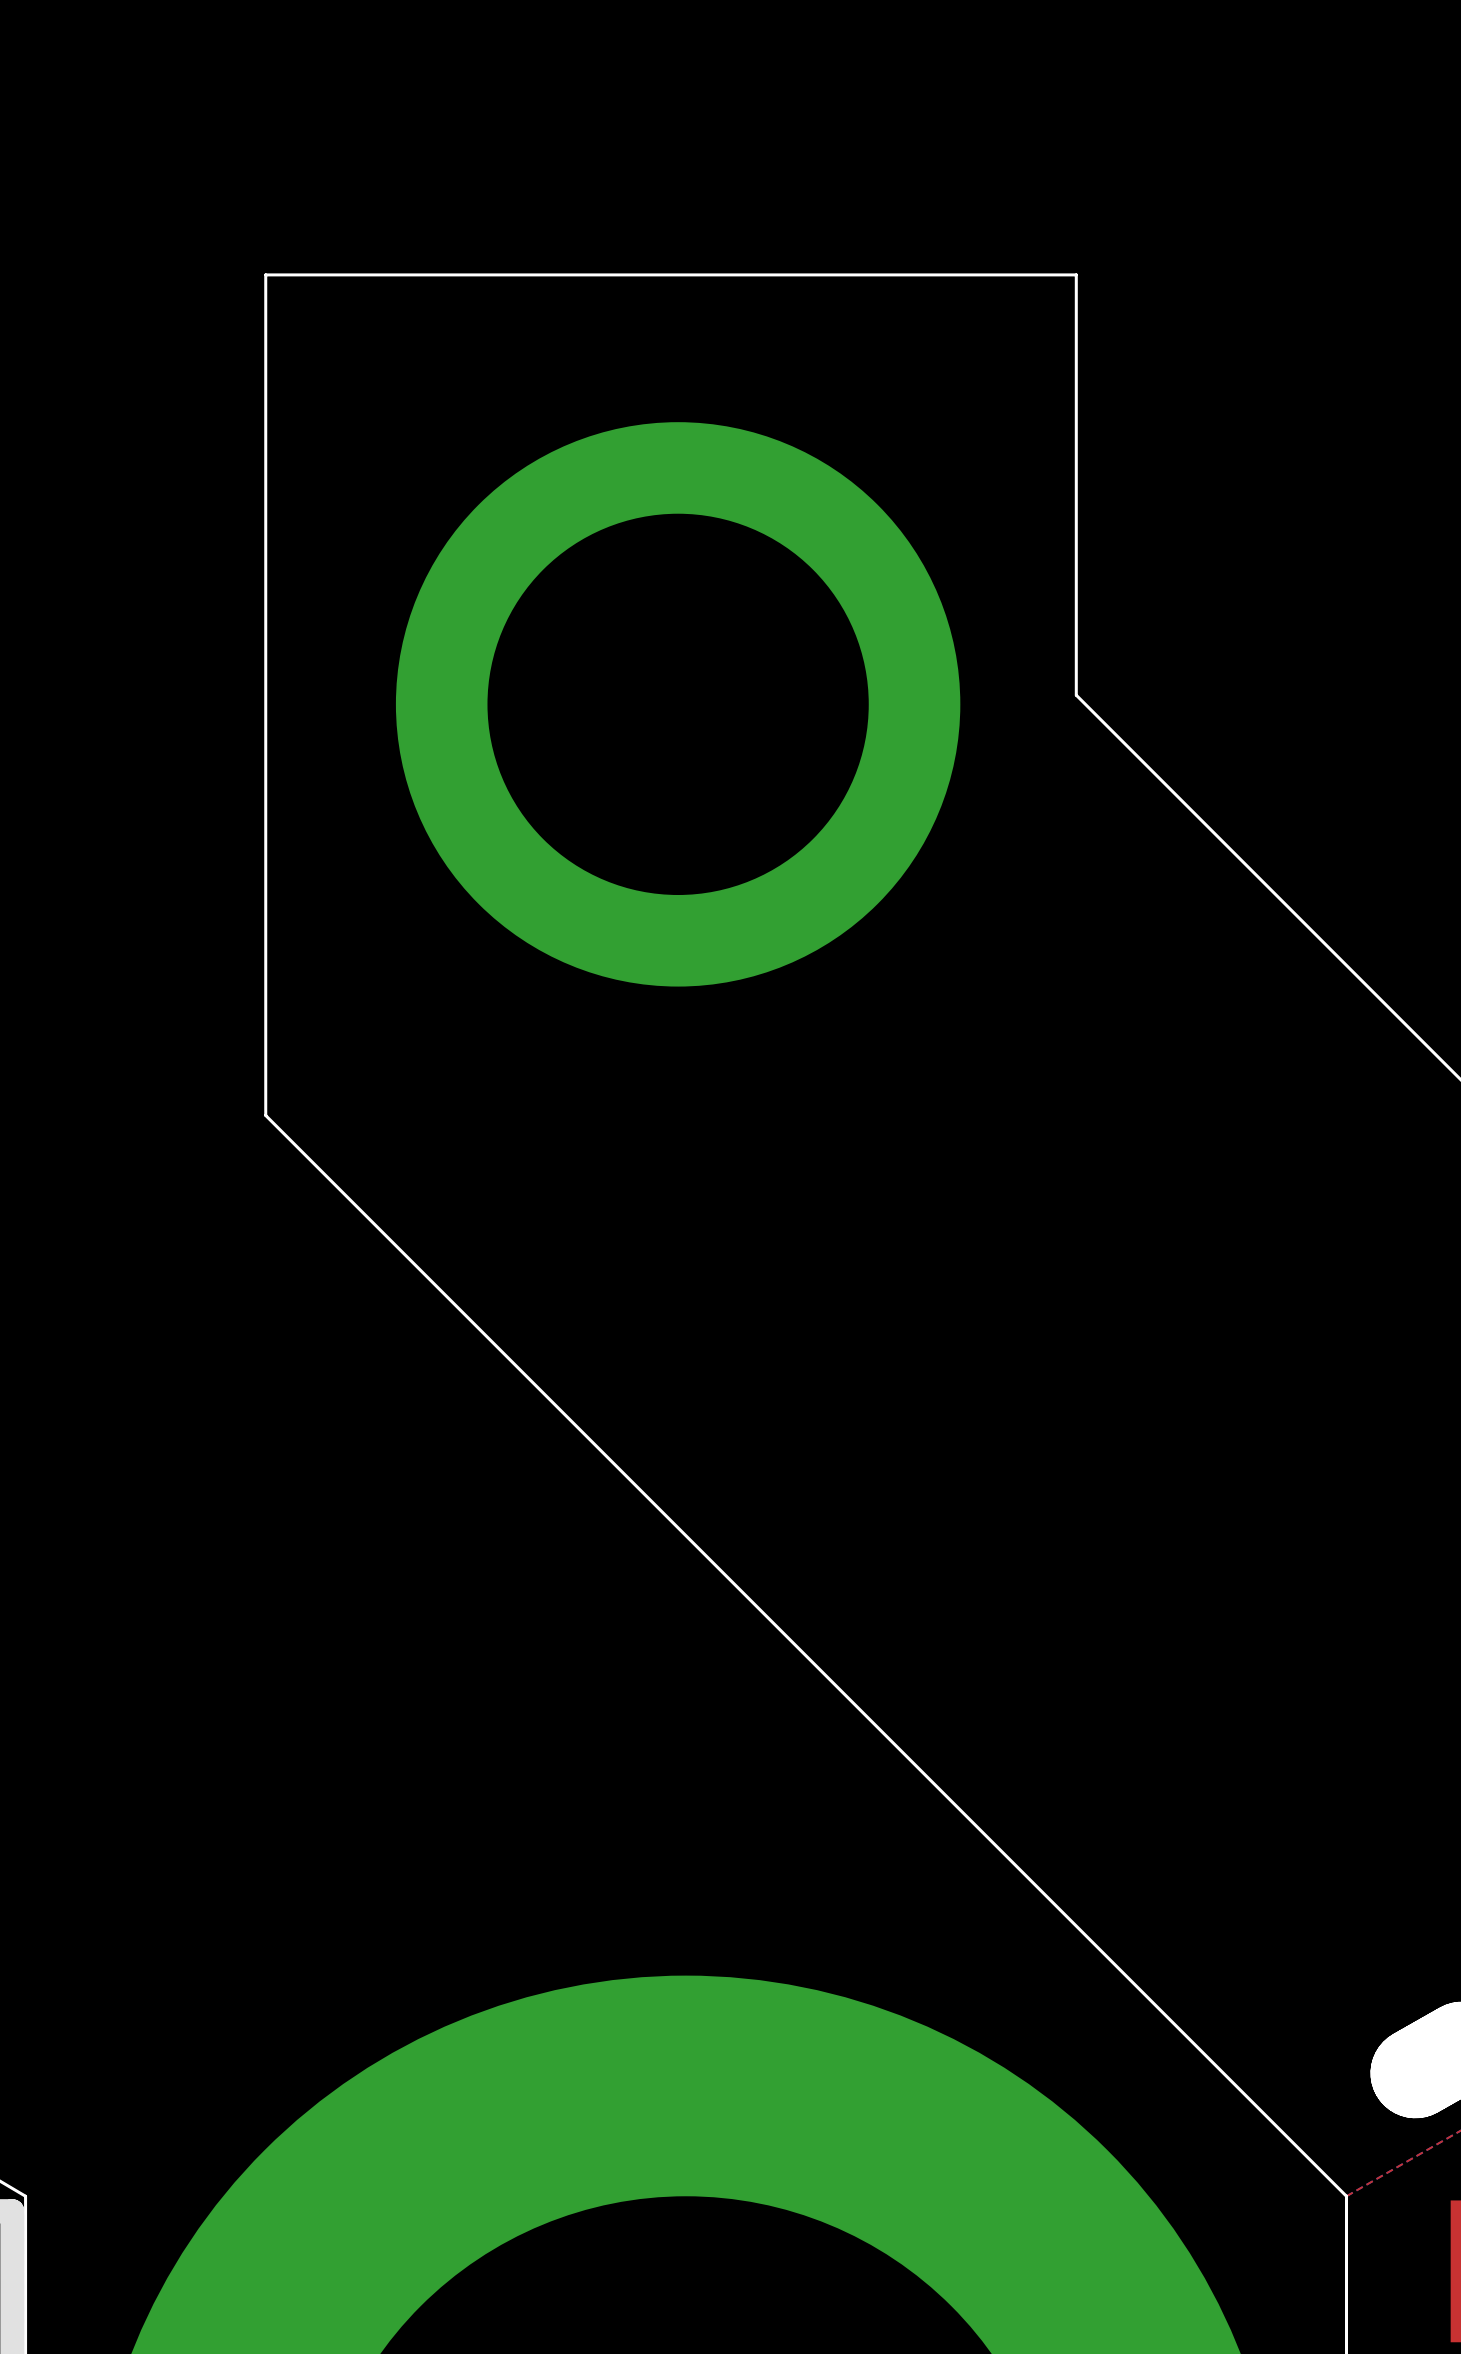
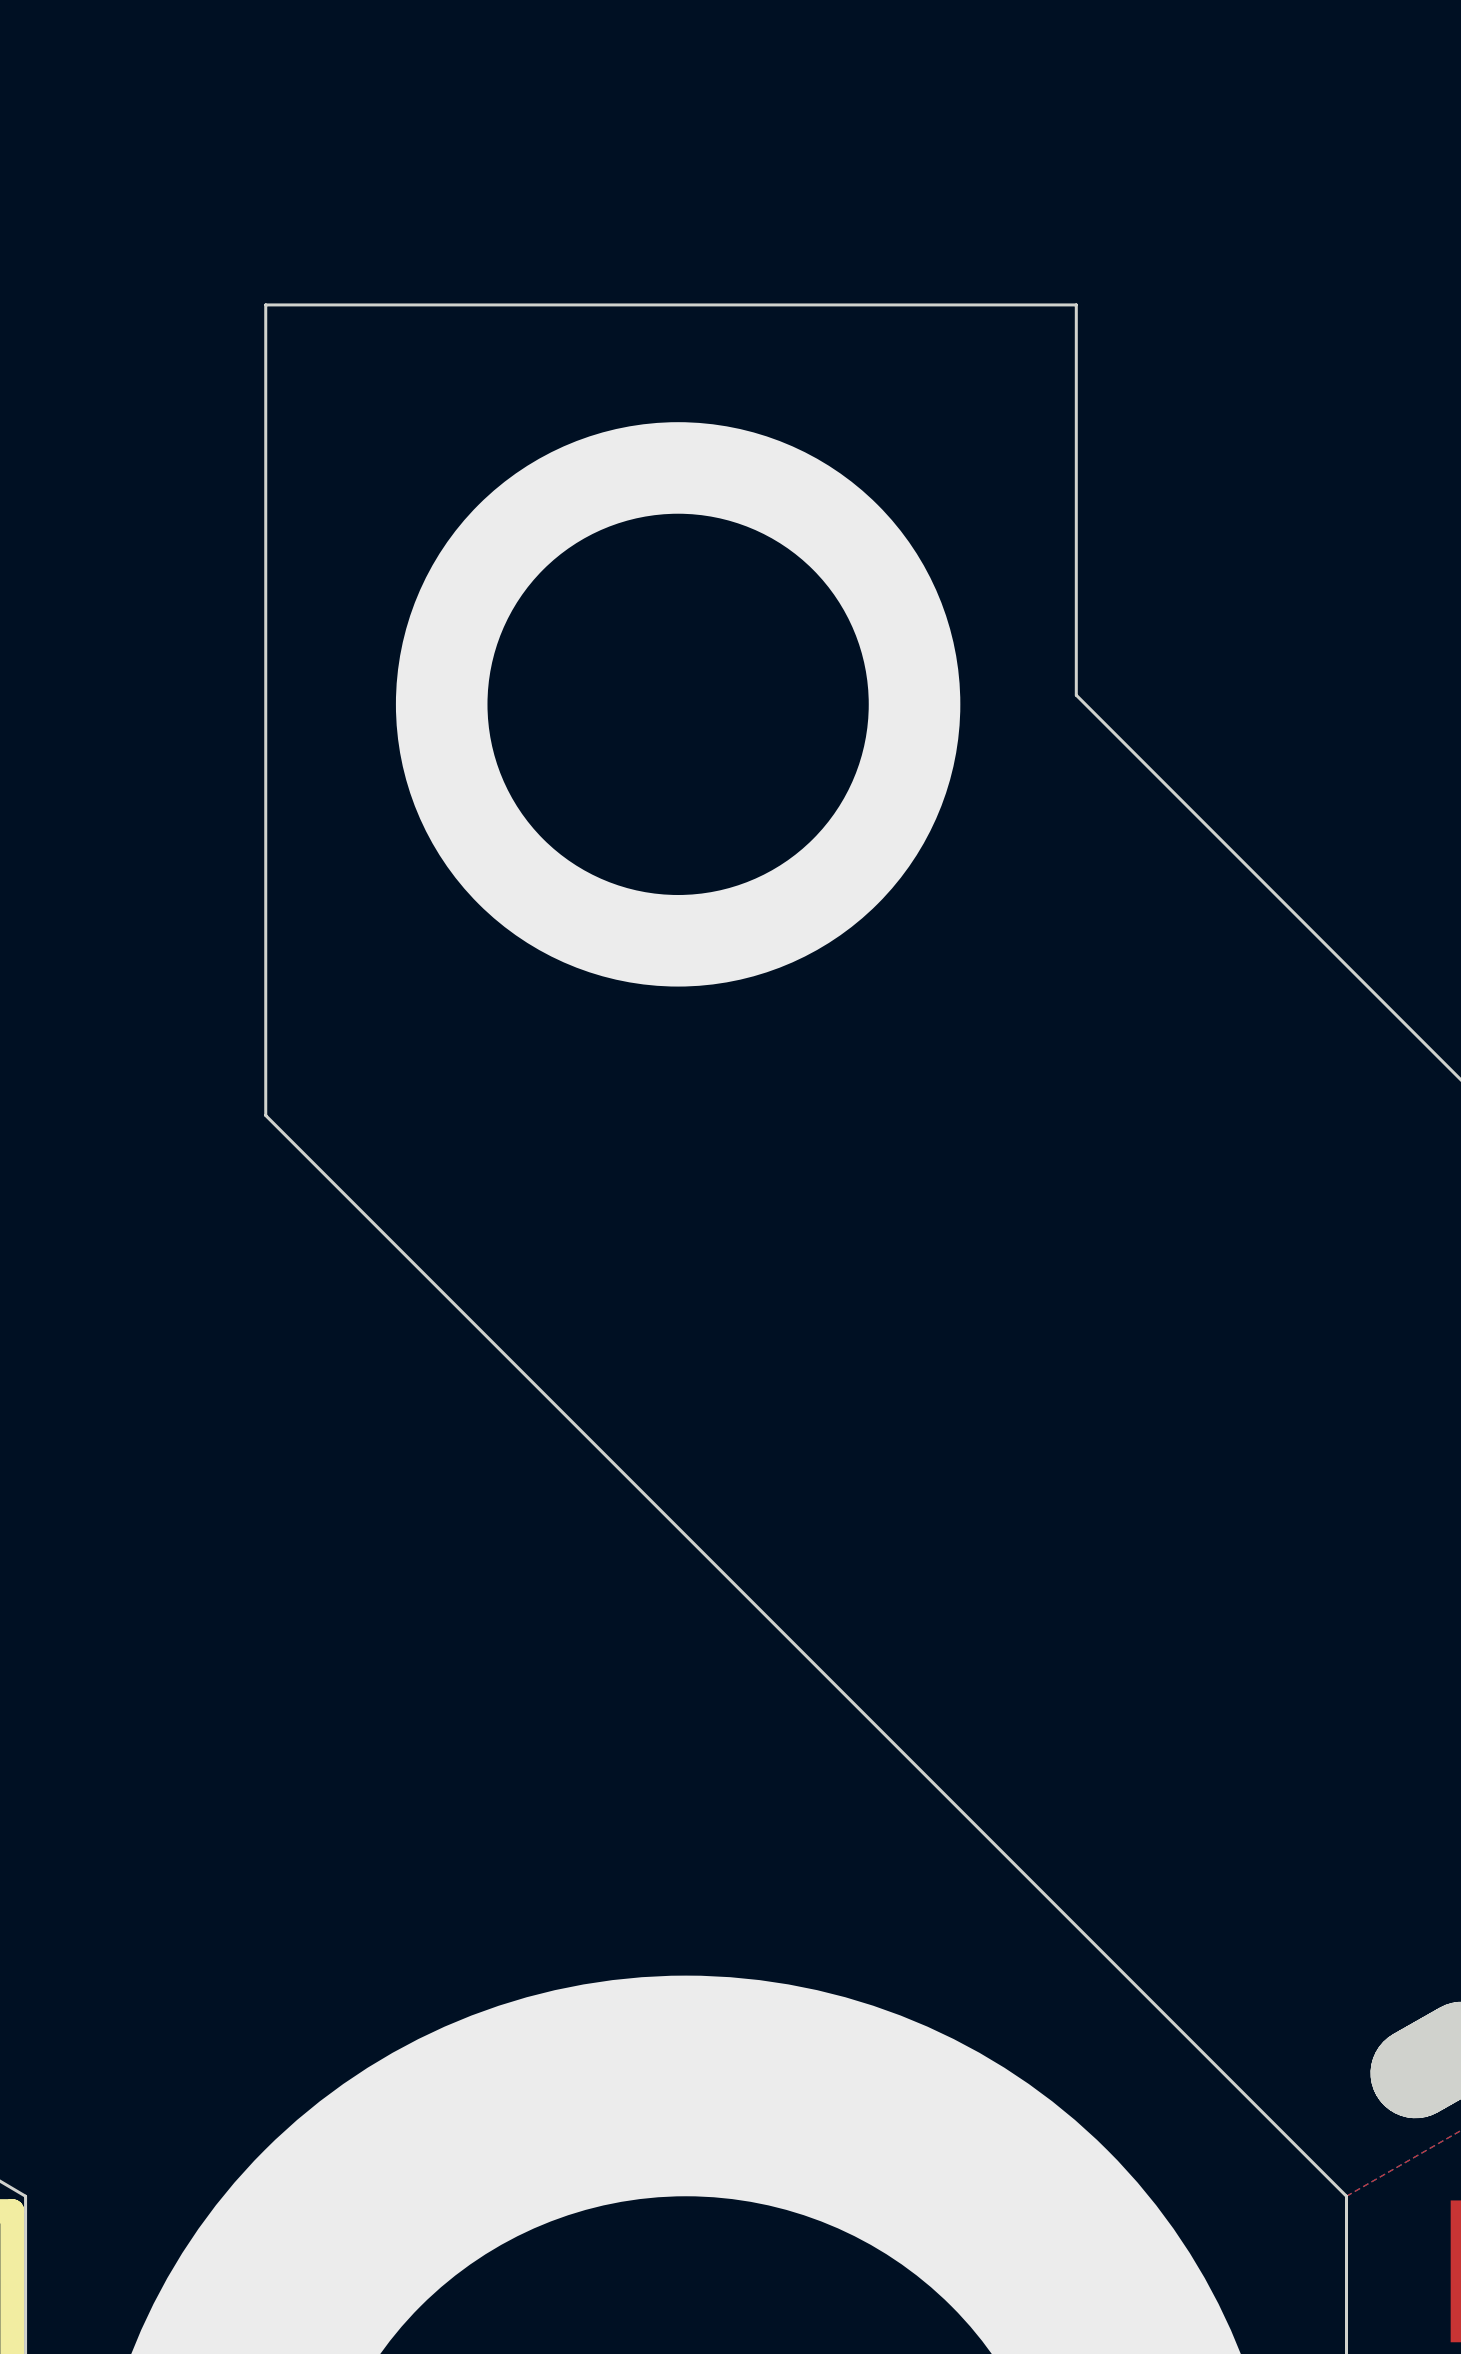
board edge: (265, 304) (265, 274) (1076, 274) (1076, 304) -> (265, 304) (1076, 304)

